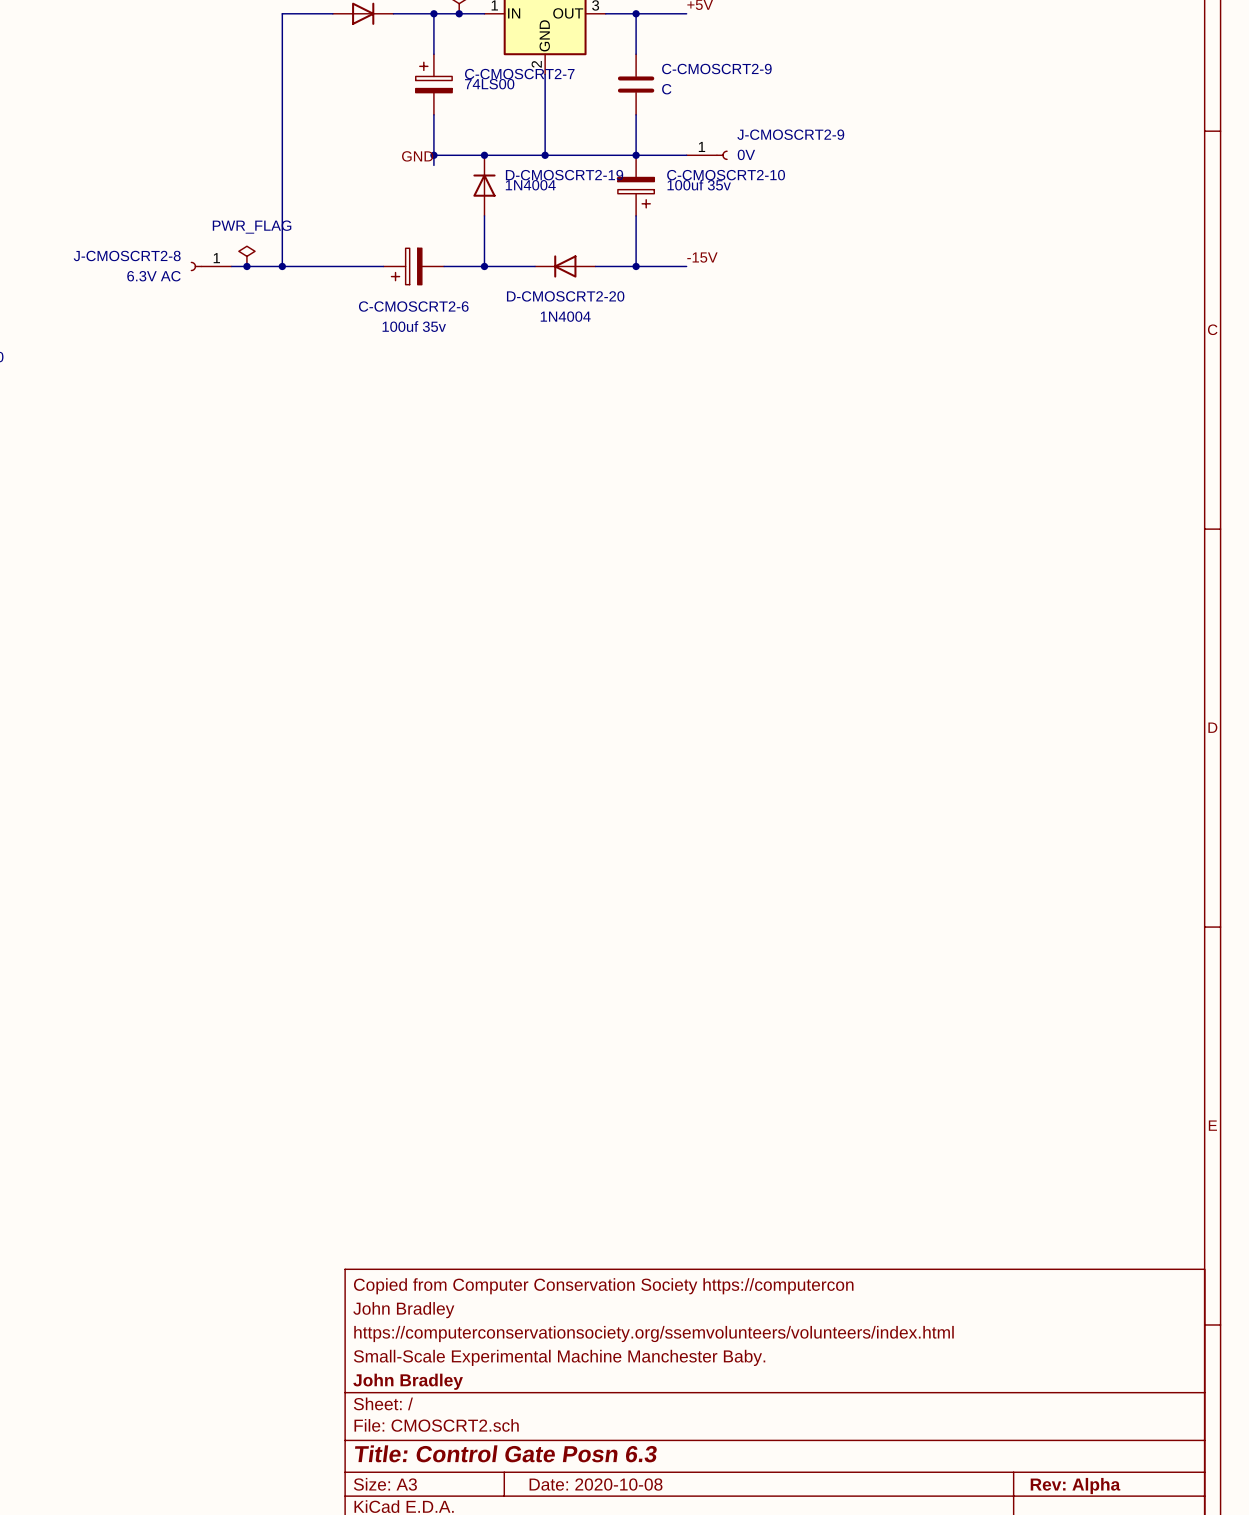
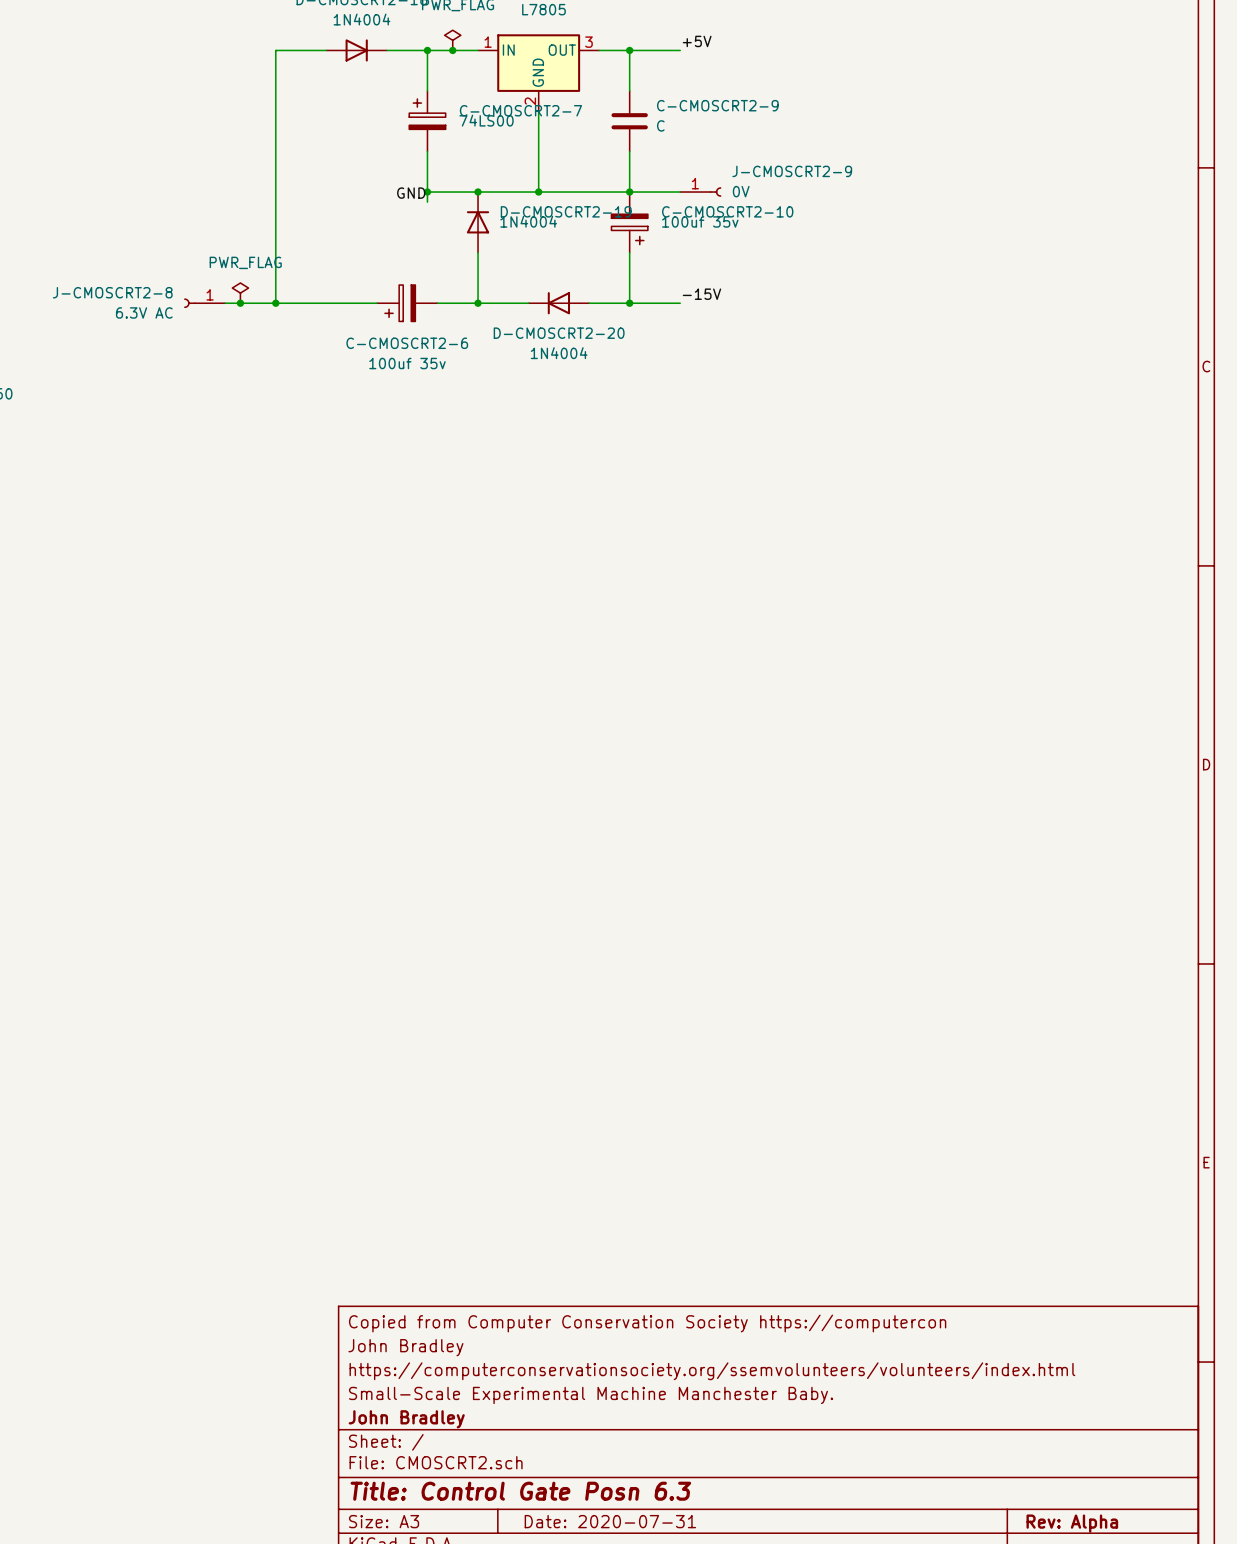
title block: Date: 2020-10-08 (596, 1484) -> Date: 2020-07-31 (610, 1521)

